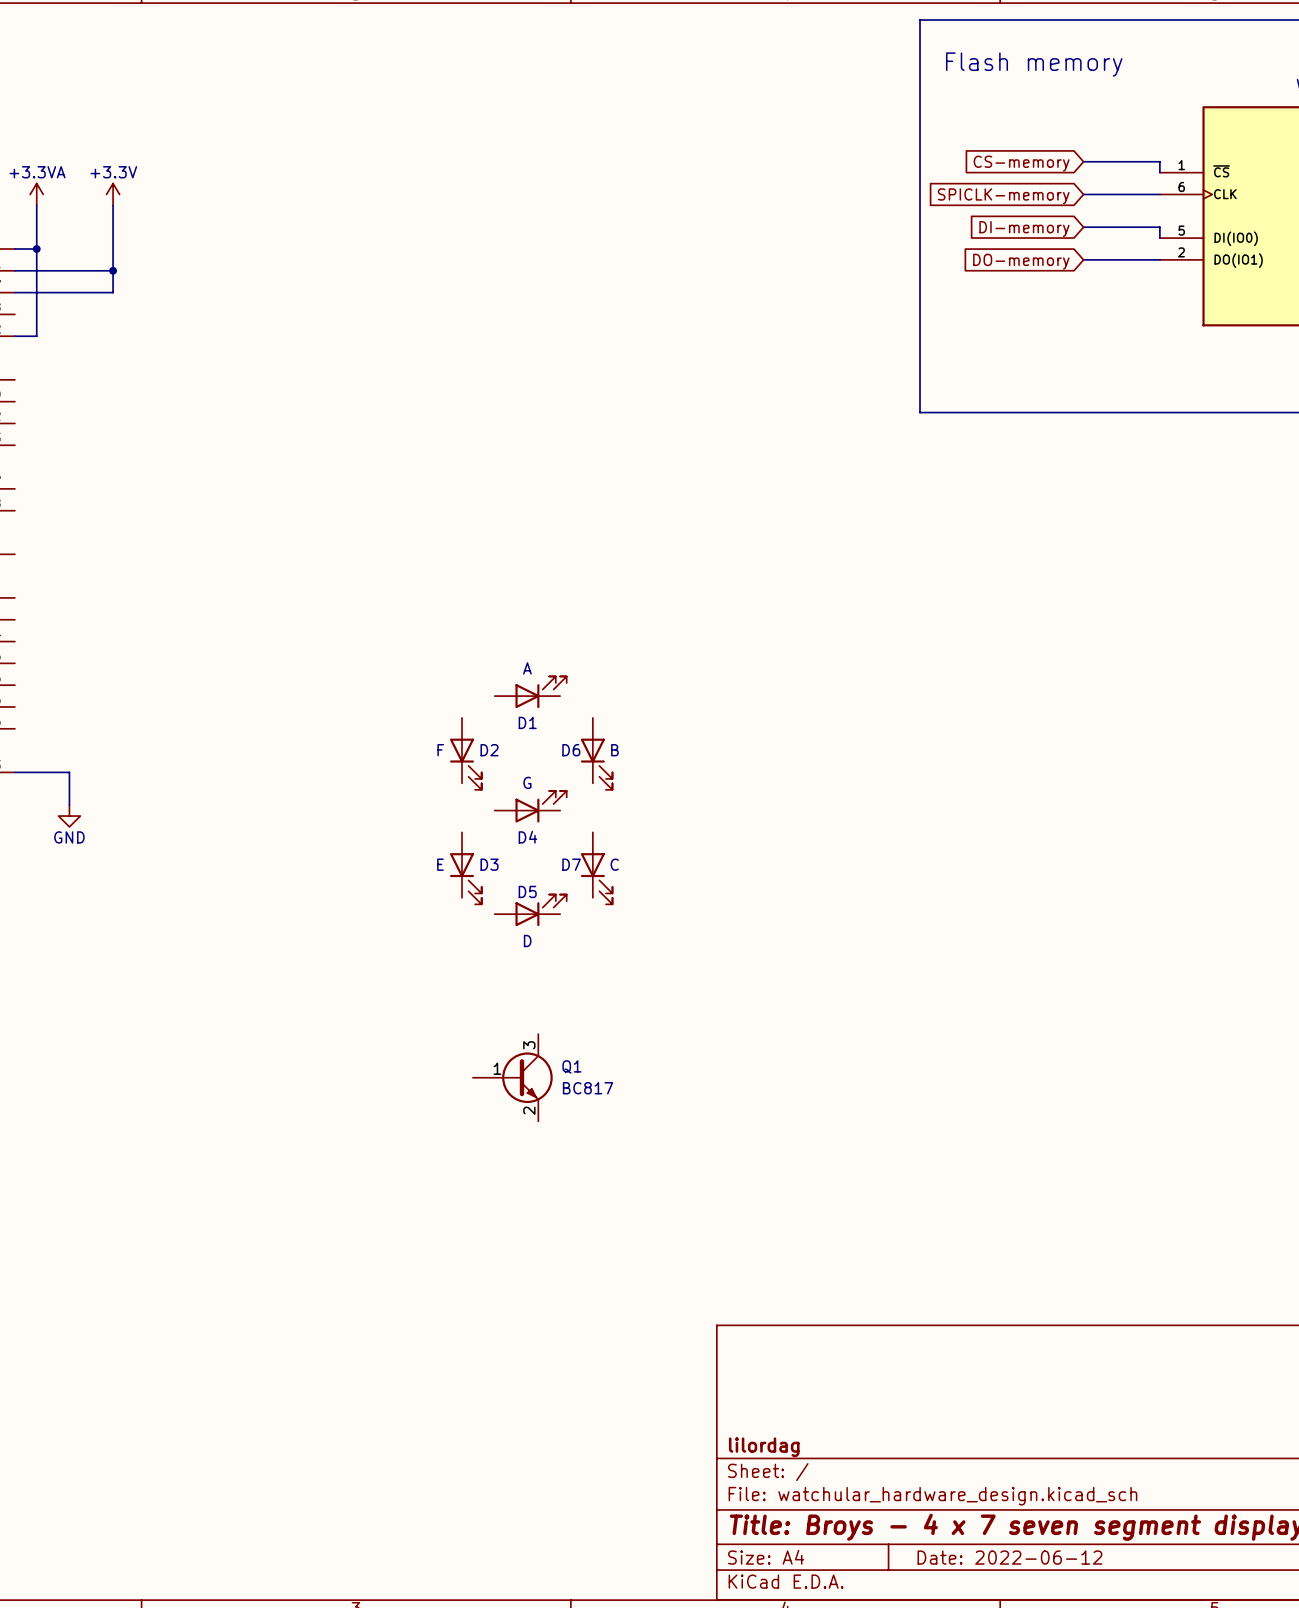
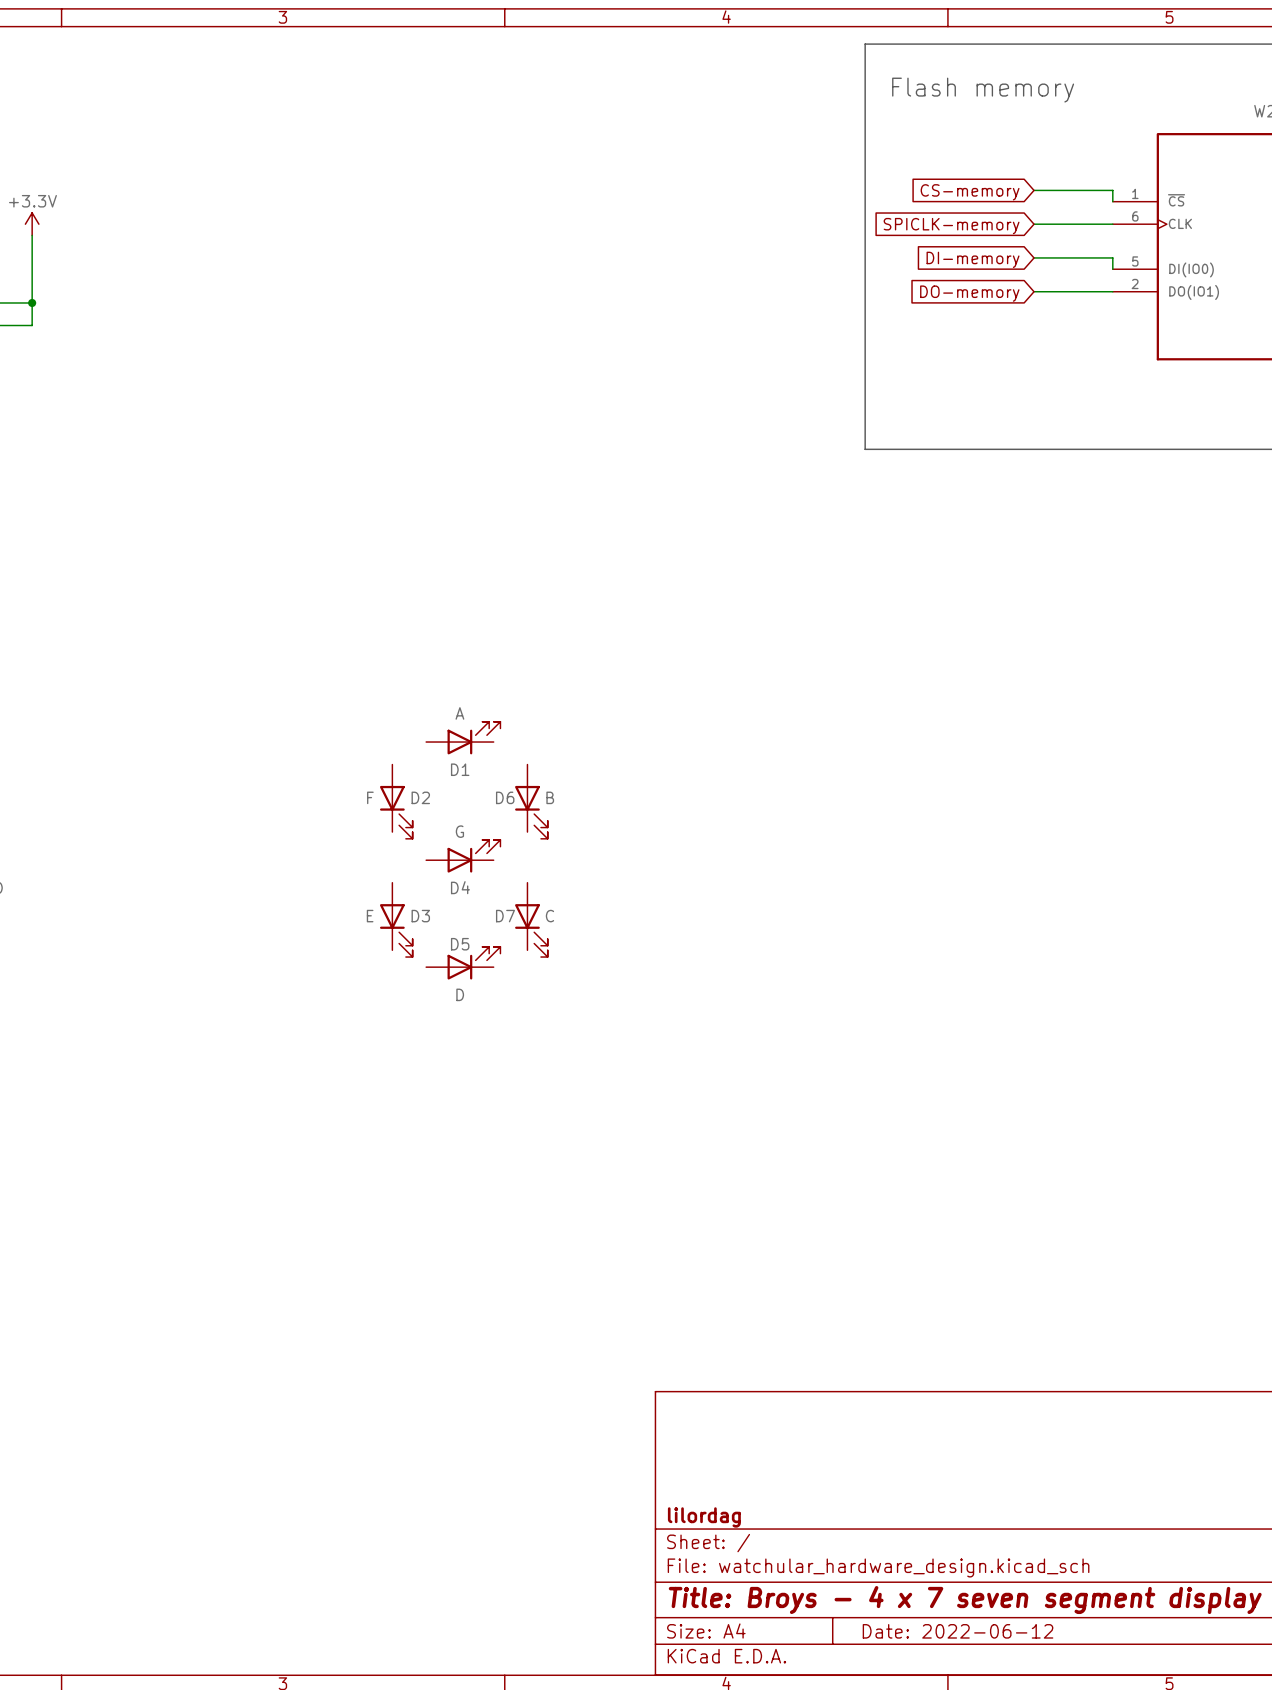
Q1: BC817 (512, 1077) -> none

